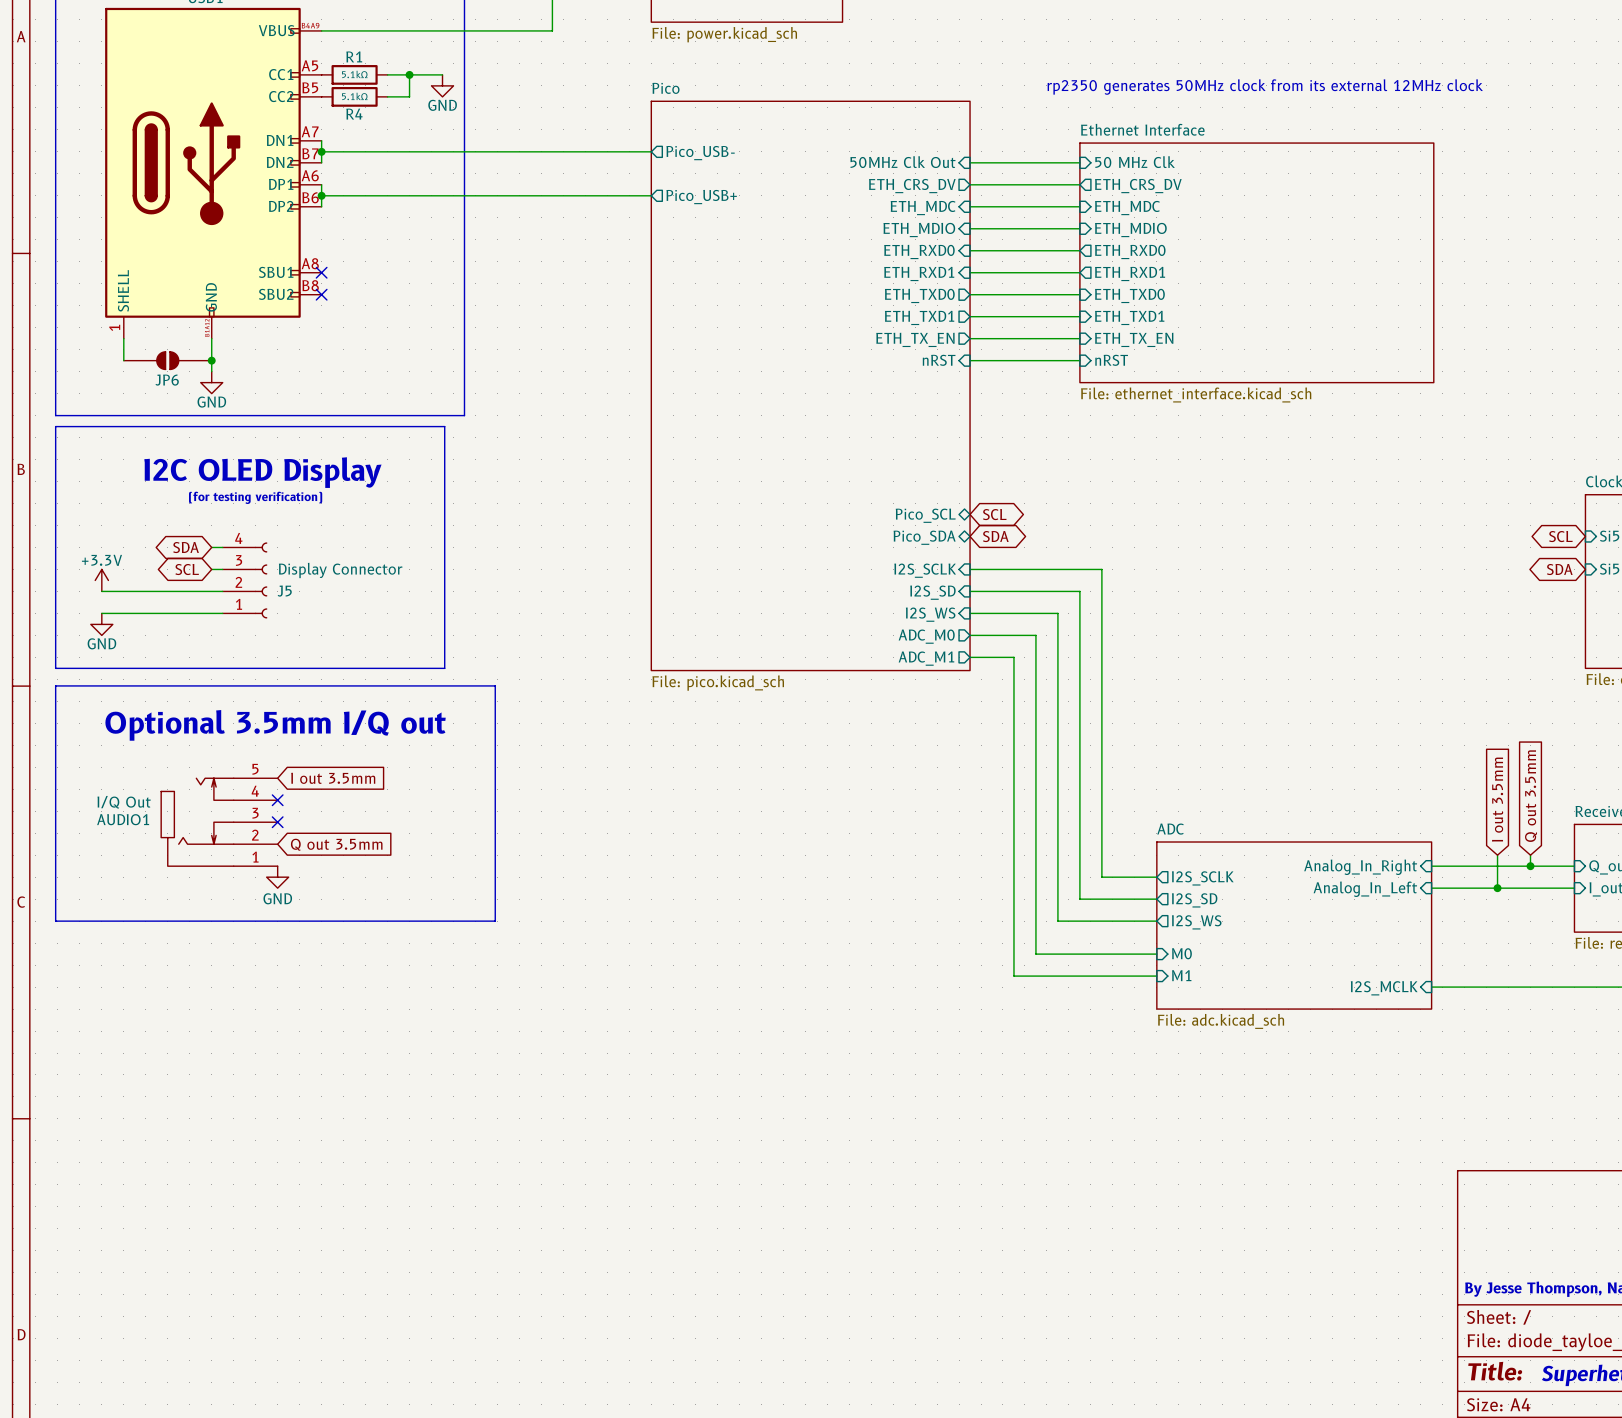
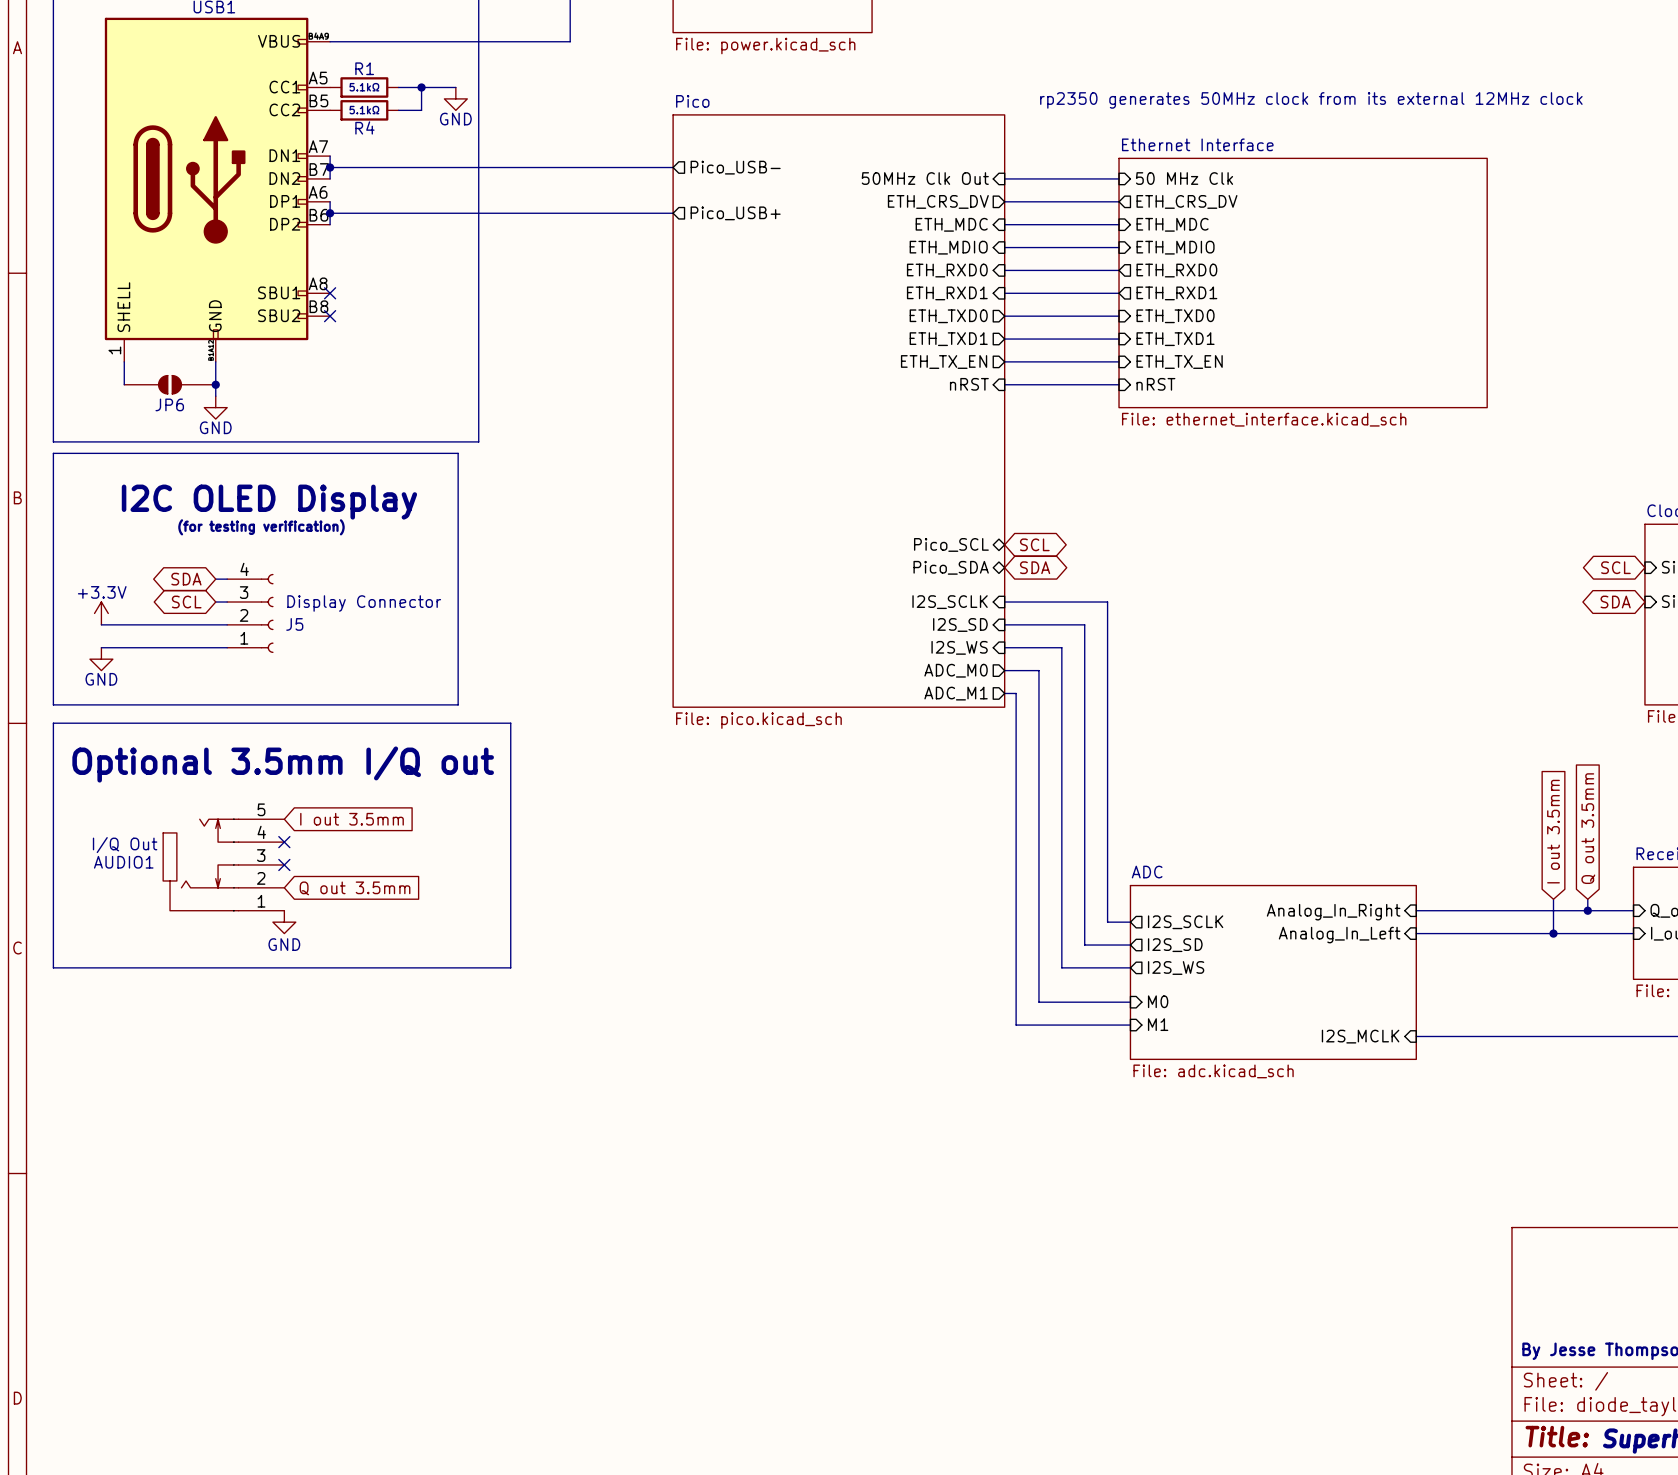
wire: (1068, 569) (1101, 569) (1101, 877) (1156, 877) -> (1107, 602) (1107, 922) (1130, 922)
wire: (1046, 591) (1079, 591) (1079, 899) -> (1084, 624) (1084, 945) (1119, 945)
wire: (1024, 613) (1057, 613) (1057, 921) -> (1061, 647) (1061, 967) (1096, 967)
wire: (1002, 635) (1035, 635) (1035, 954) -> (1038, 670) (1038, 1002) (1073, 1002)
wire: (981, 657) (1013, 657) (1013, 976) -> (1016, 693) (1016, 1025) (1050, 1025)
wire: none -> (1416, 910) (1484, 910)
sheet pin position: Analog_In_Right (1360, 867) -> Analog_In_Right (1333, 912)
sheet pin position: I2S_SCLK (1202, 878) -> I2S_SCLK (1185, 922)
wire: none -> (1416, 933) (1484, 933)
sheet pin position: Analog_In_Left (1365, 889) -> Analog_In_Left (1339, 935)
wire: (1090, 899) (1156, 899) -> none
sheet pin position: I2S_SD (1194, 900) -> I2S_SD (1175, 945)
wire: (1090, 921) (1156, 921) -> none
sheet pin position: I2S_WS (1196, 922) -> I2S_WS (1176, 968)
sheet ADC position: (1294, 925) -> (1273, 972)
sheet pin position: M0 (1181, 953) -> M0 (1158, 1001)
wire: (1090, 954) (1156, 954) -> none
sheet pin position: M1 (1181, 975) -> M1 (1158, 1024)
wire: (1090, 976) (1156, 976) -> none
wire: none -> (1416, 1036) (1484, 1036)
sheet pin position: I2S_MCLK (1384, 988) -> I2S_MCLK (1360, 1036)

